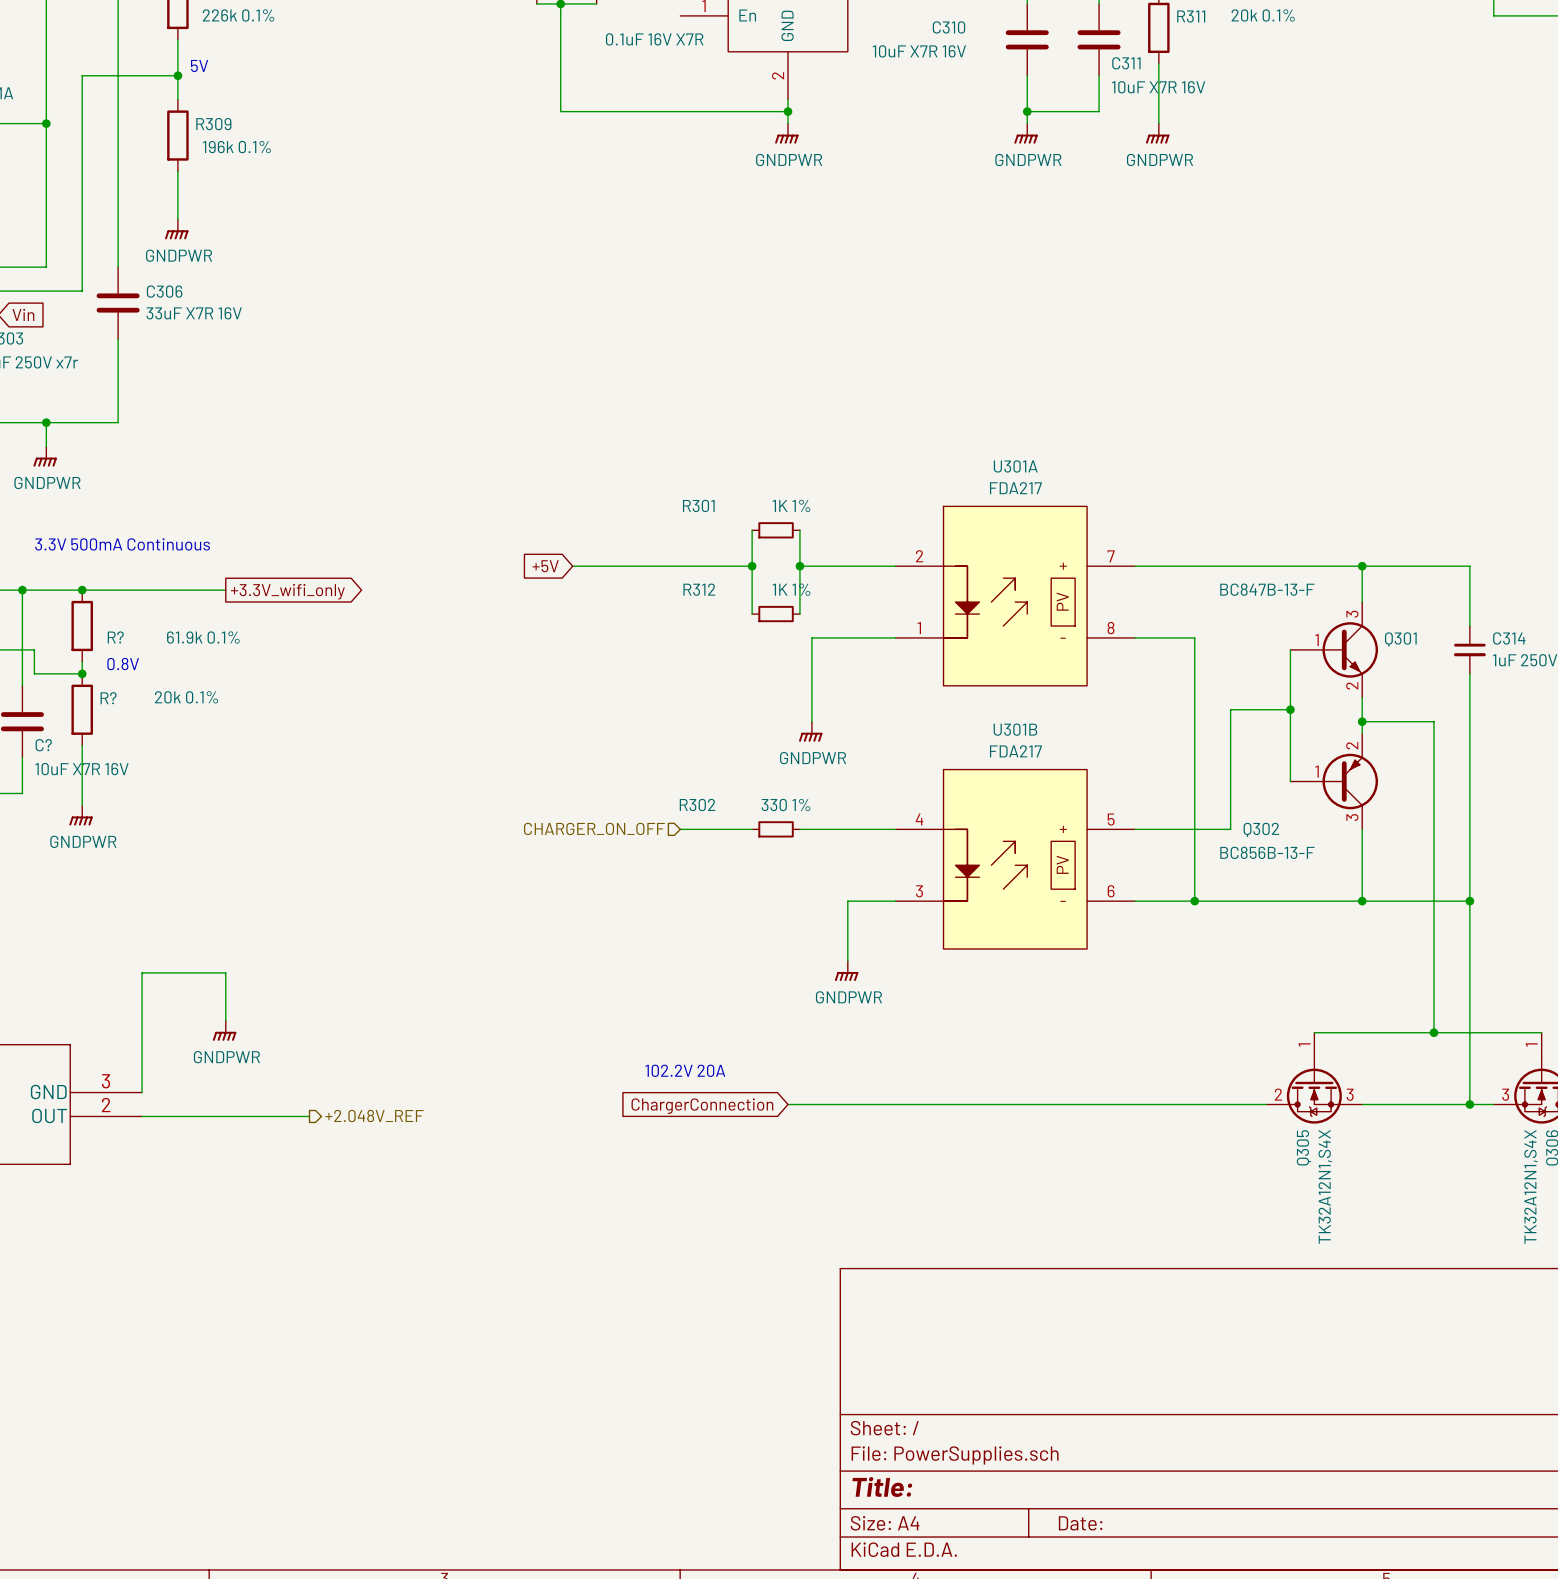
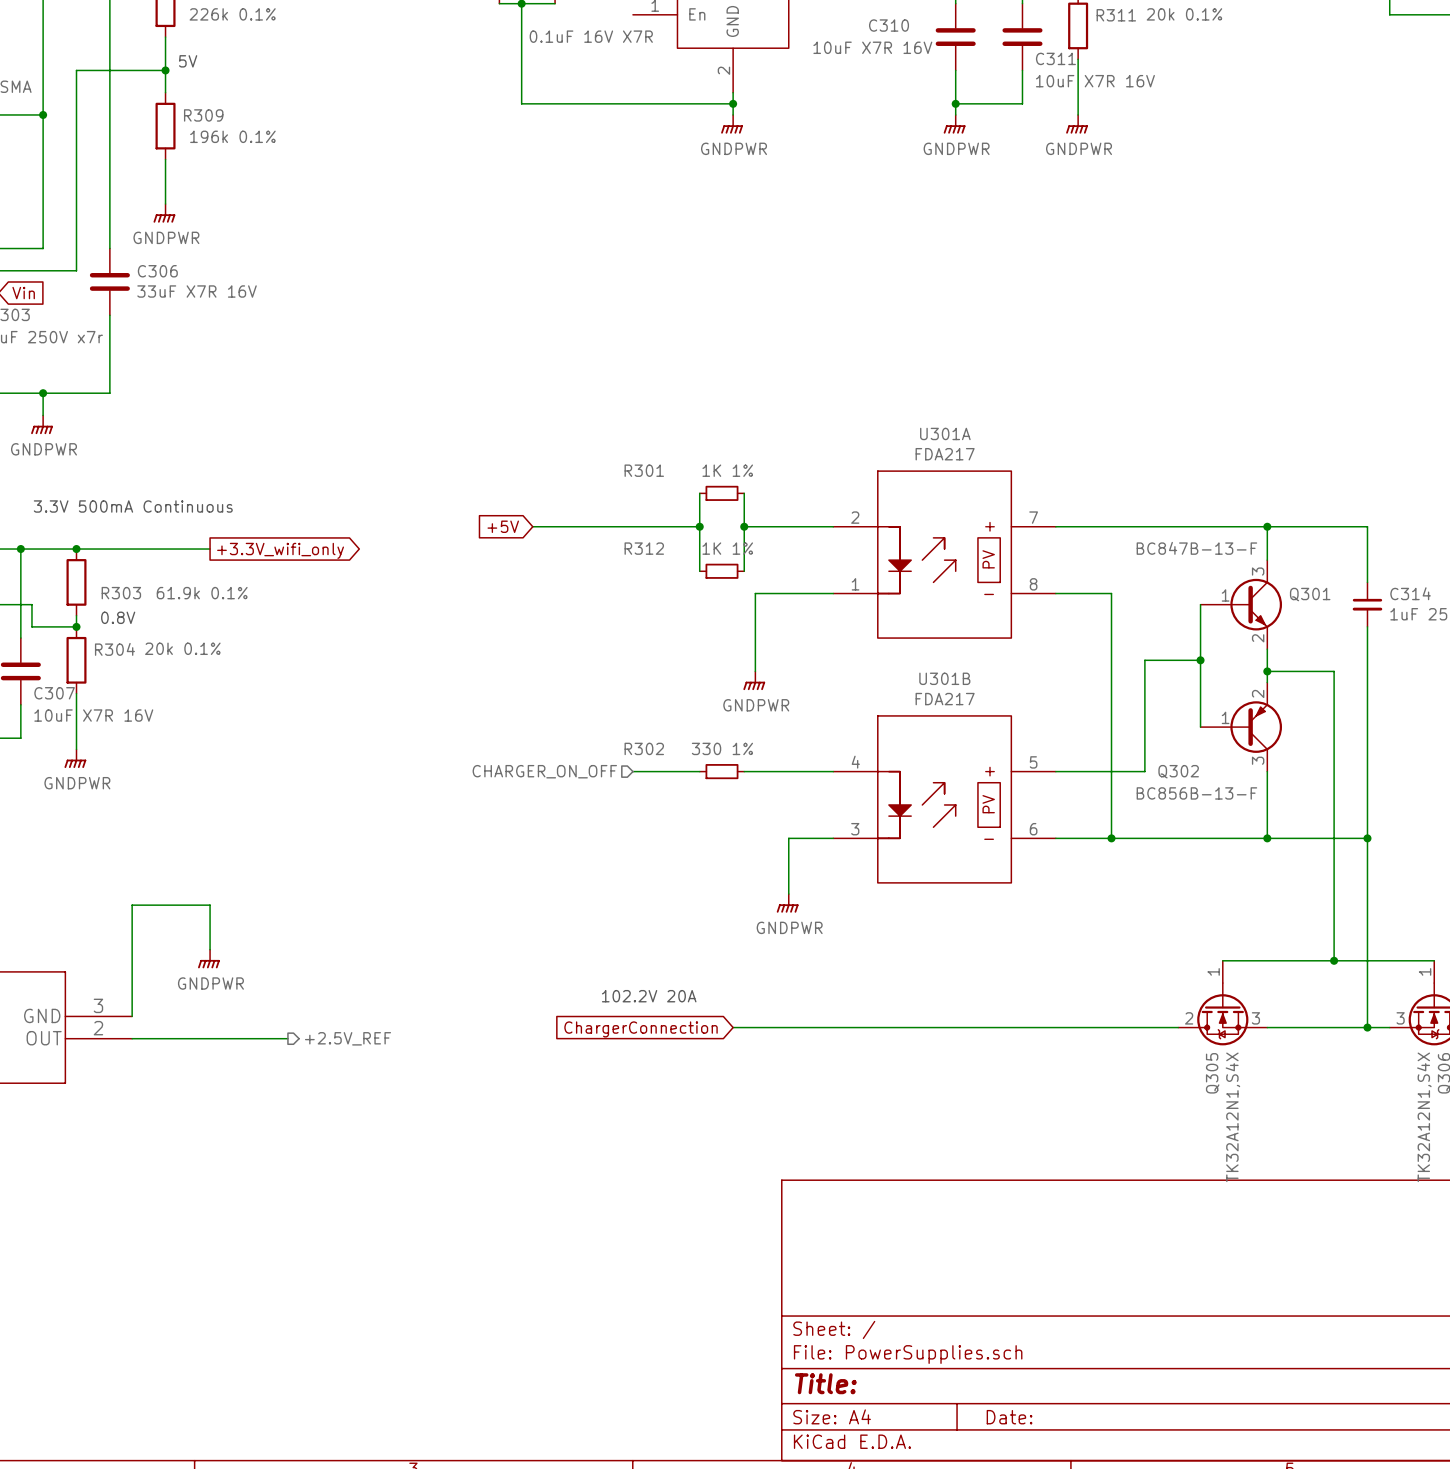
R? name: R? (115, 637) -> R303 (121, 593)
R? name: R? (108, 698) -> R304 (114, 649)
C? name: C? (43, 745) -> C307 (54, 693)
hierarchical label: +2.048V_REF (374, 1116) -> +2.5V_REF (348, 1038)

